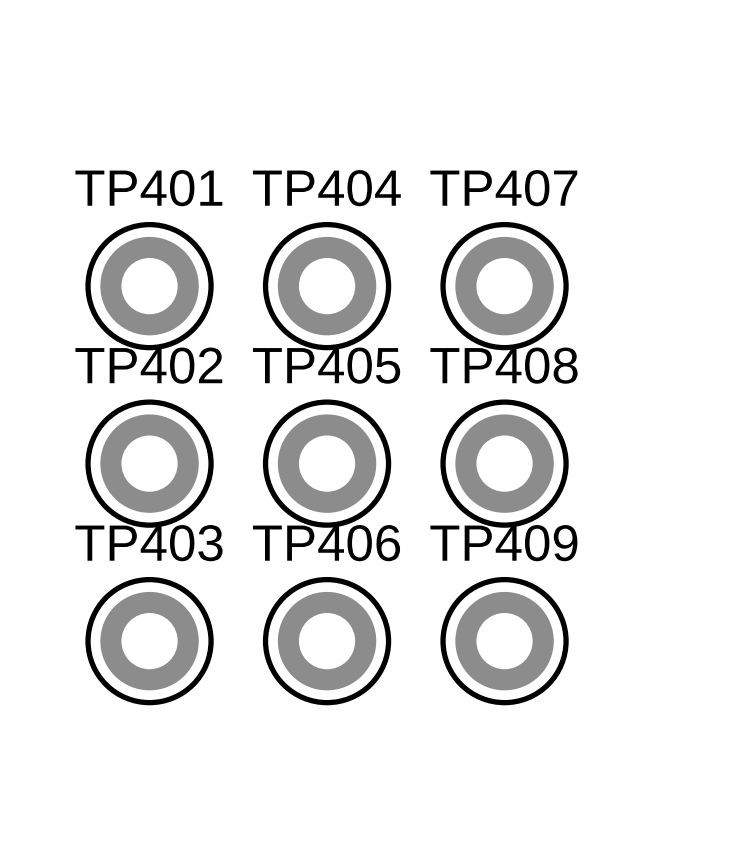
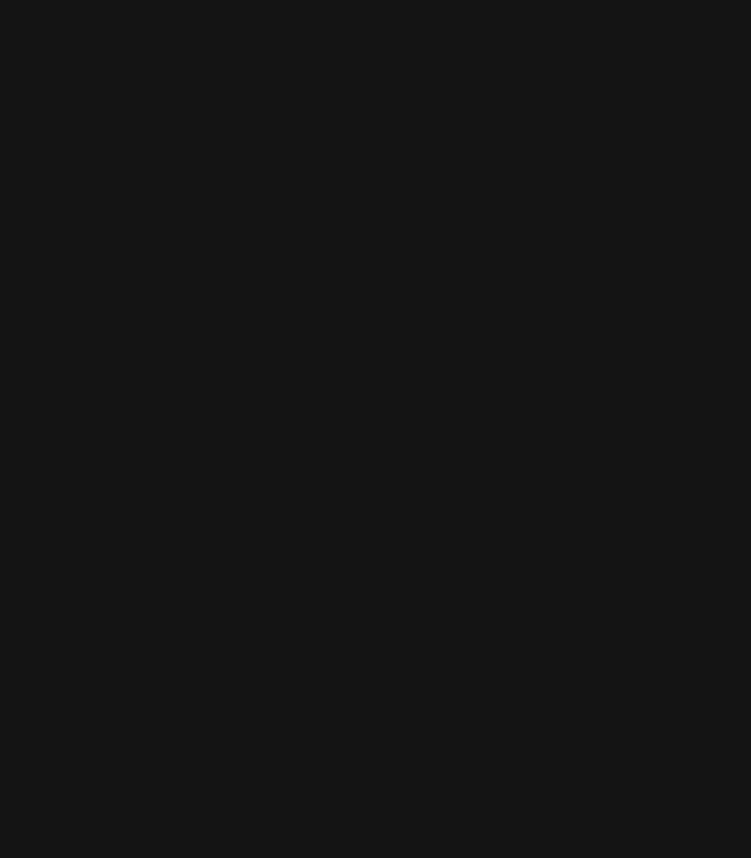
TP401: (149, 286) -> none
TP404: (327, 286) -> none
TP407: (504, 286) -> none
TP402: (149, 463) -> none
TP405: (327, 463) -> none
TP408: (504, 463) -> none
TP403: (149, 641) -> none
TP406: (327, 641) -> none
TP409: (504, 641) -> none

